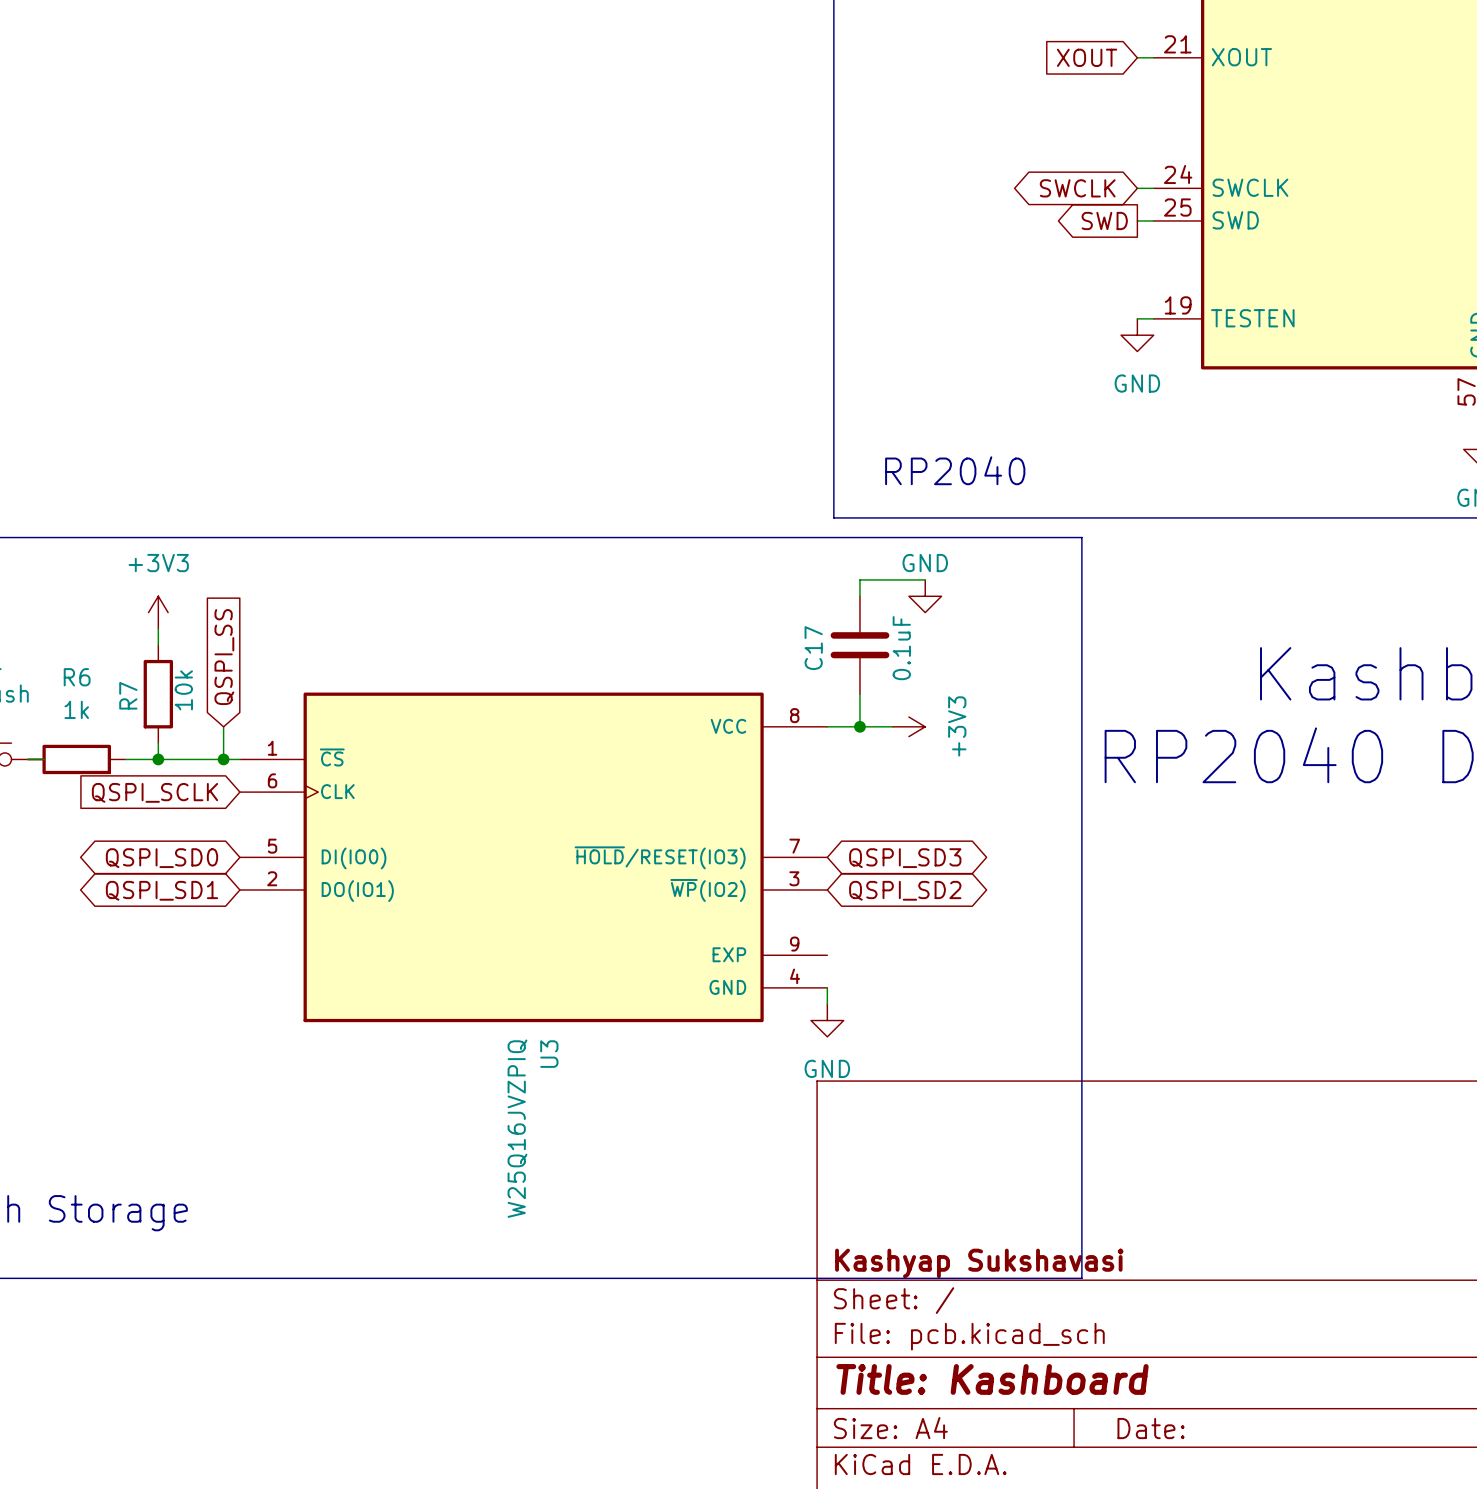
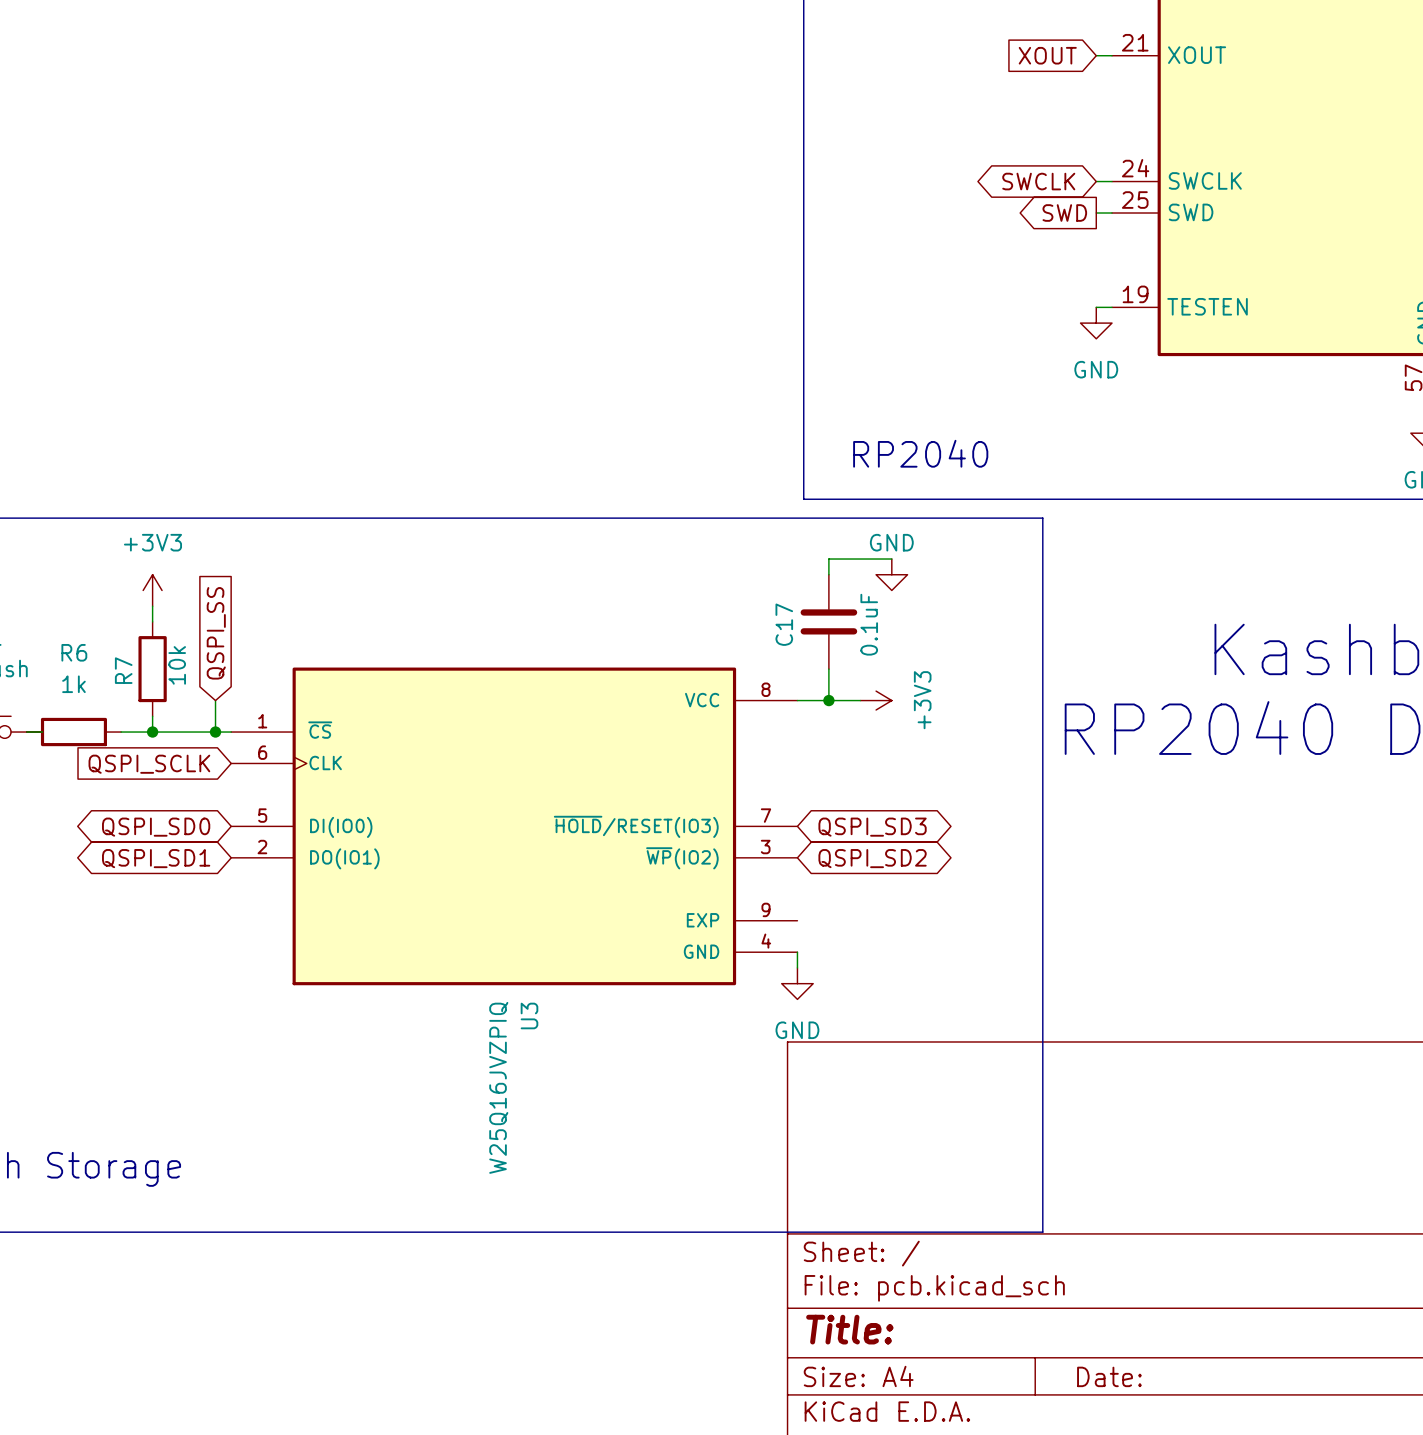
title block: Kashyap Sukshavasi (979, 1263) -> none
title block: Title: Kashboard (992, 1379) -> Title: (849, 1329)

